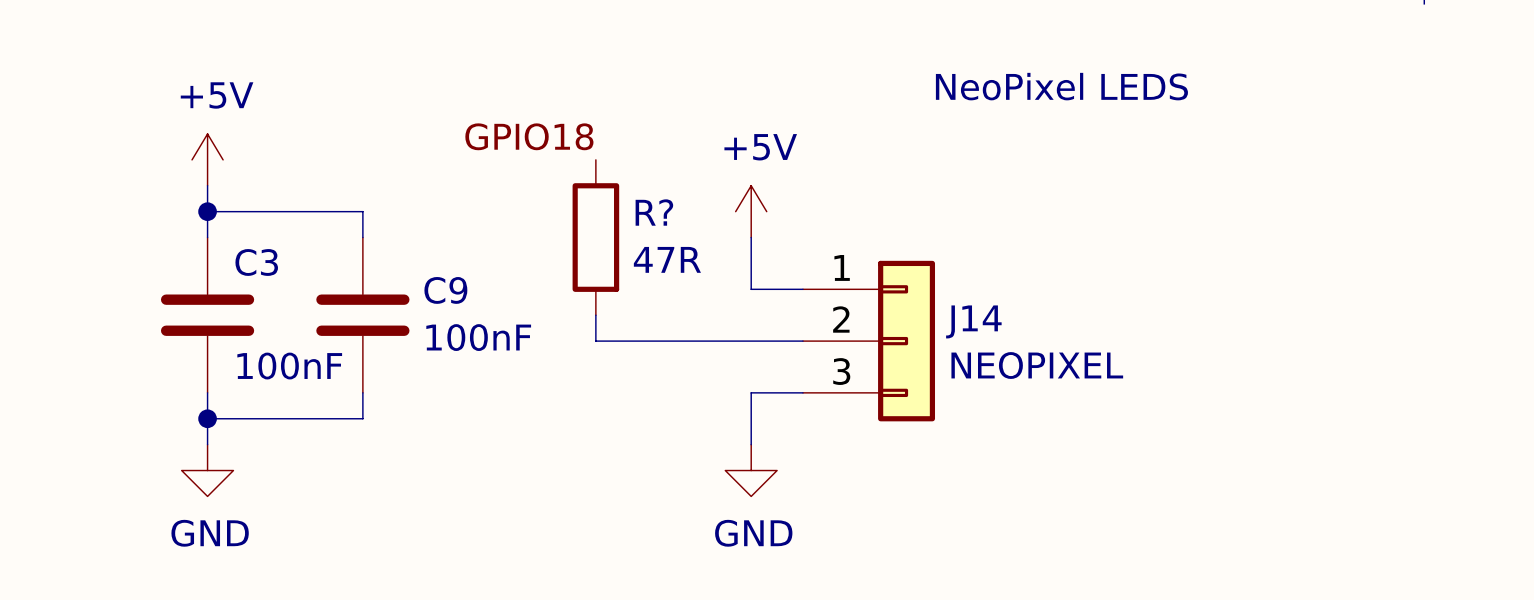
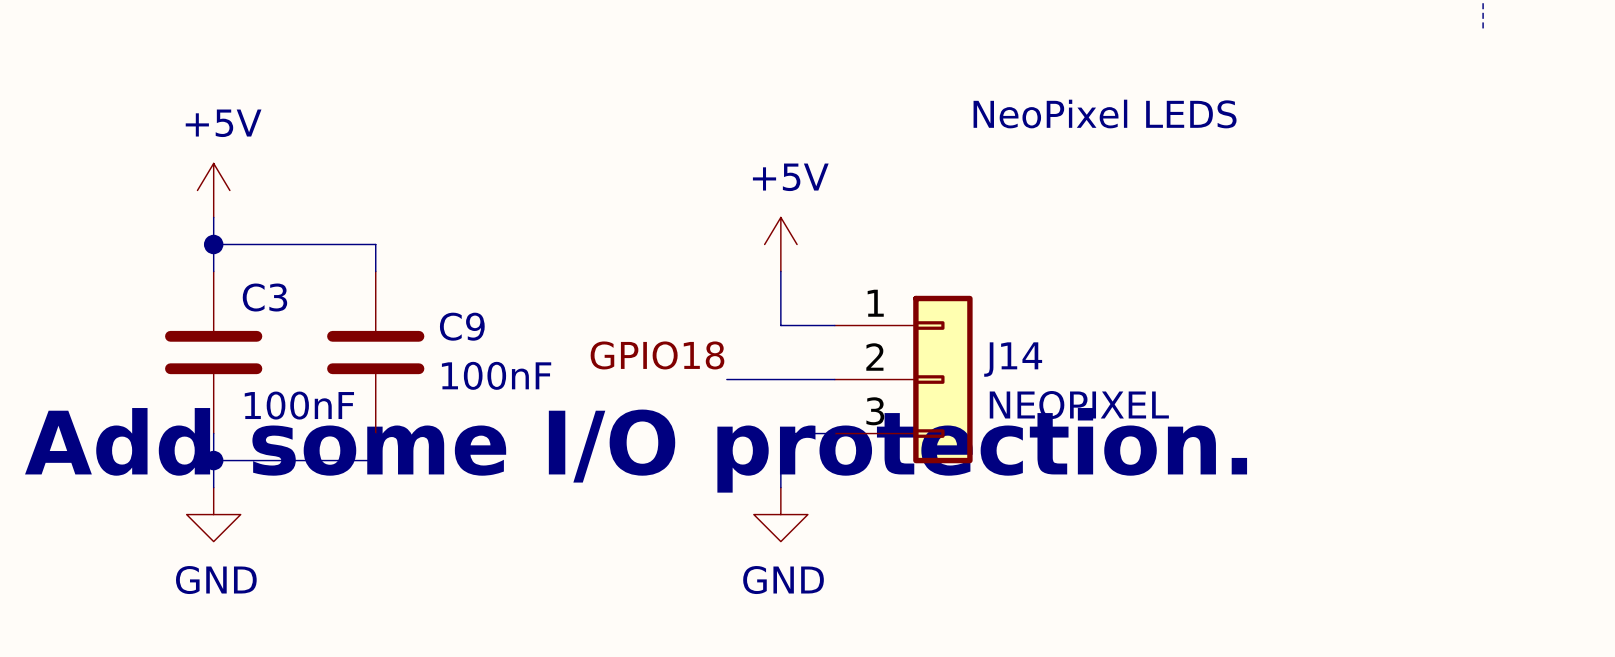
label position: GPIO18 (529, 136) -> GPIO18 (657, 355)
R?: 47R (595, 237) -> none
wire: (595, 315) (595, 341) (699, 341) -> none
text: none -> Add some I/O protection. (636, 450)

